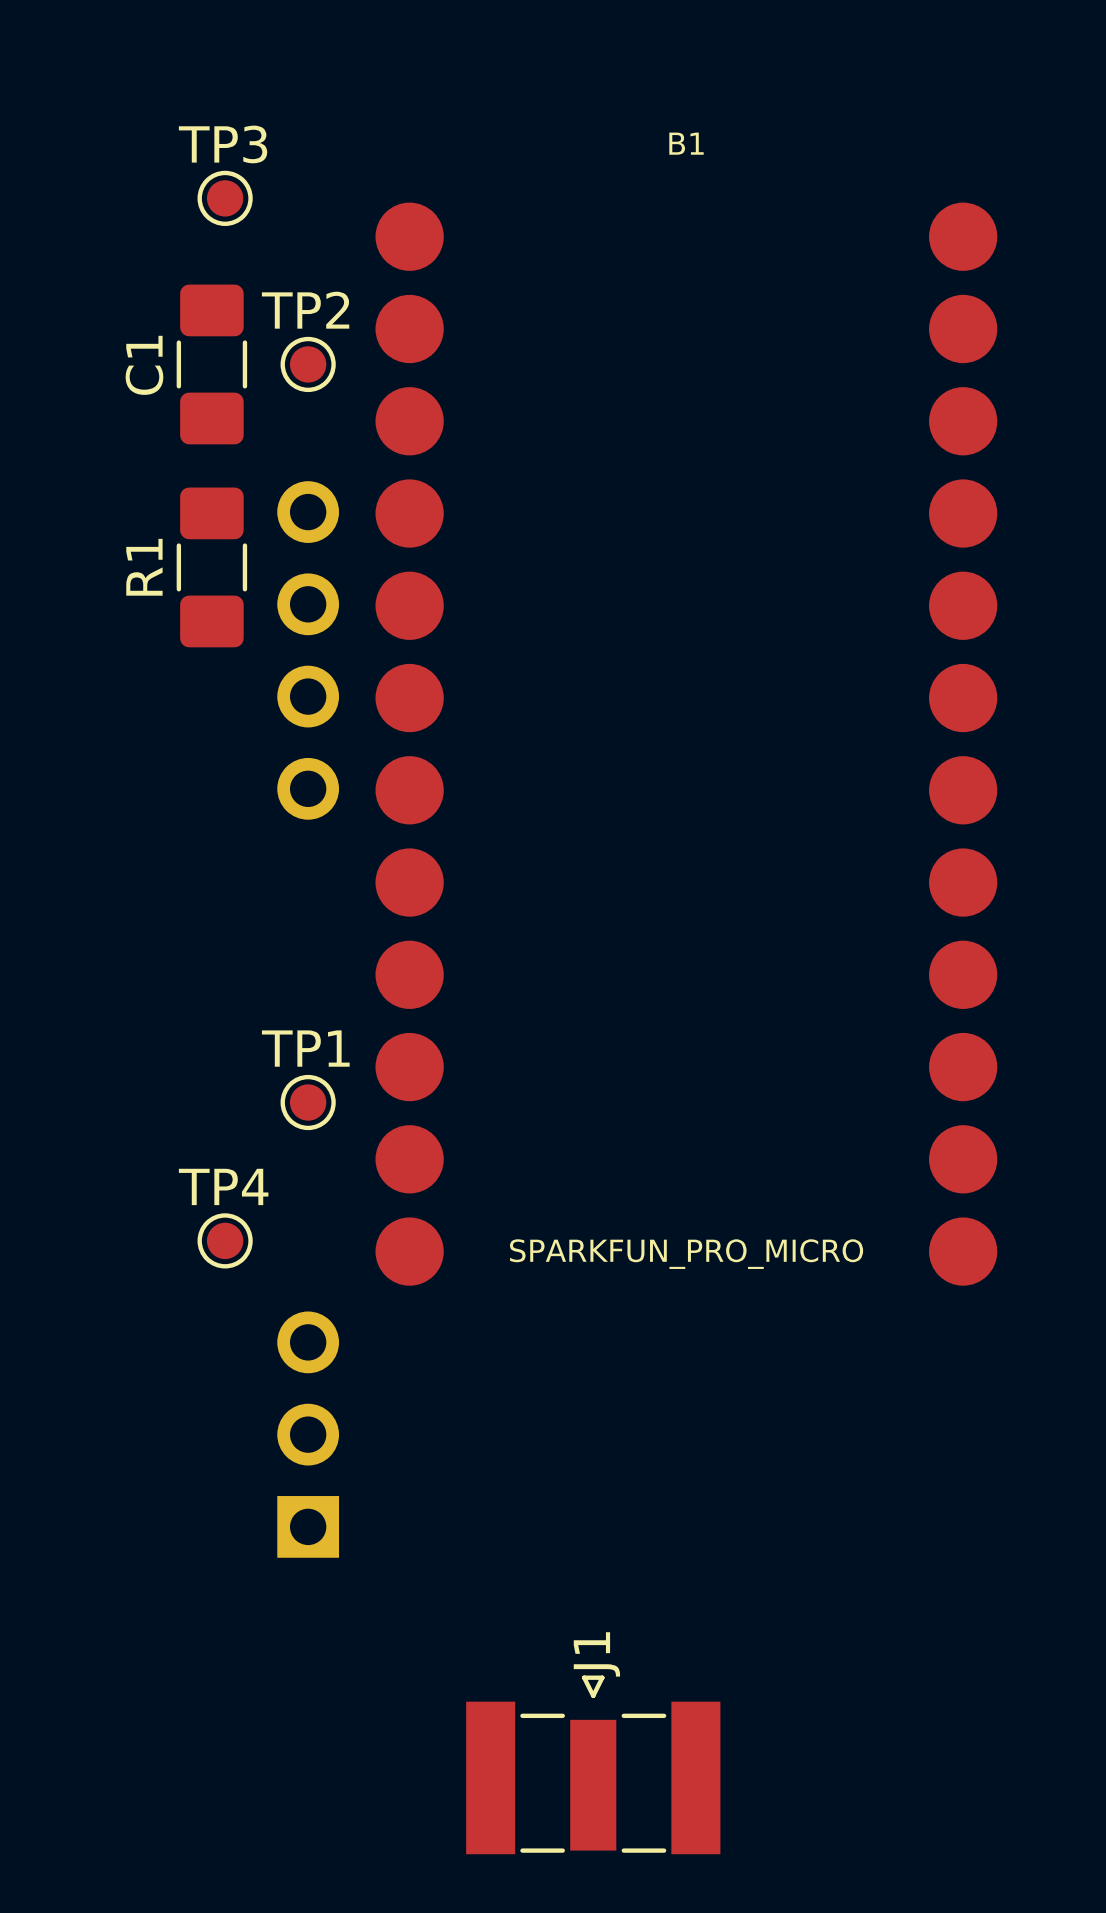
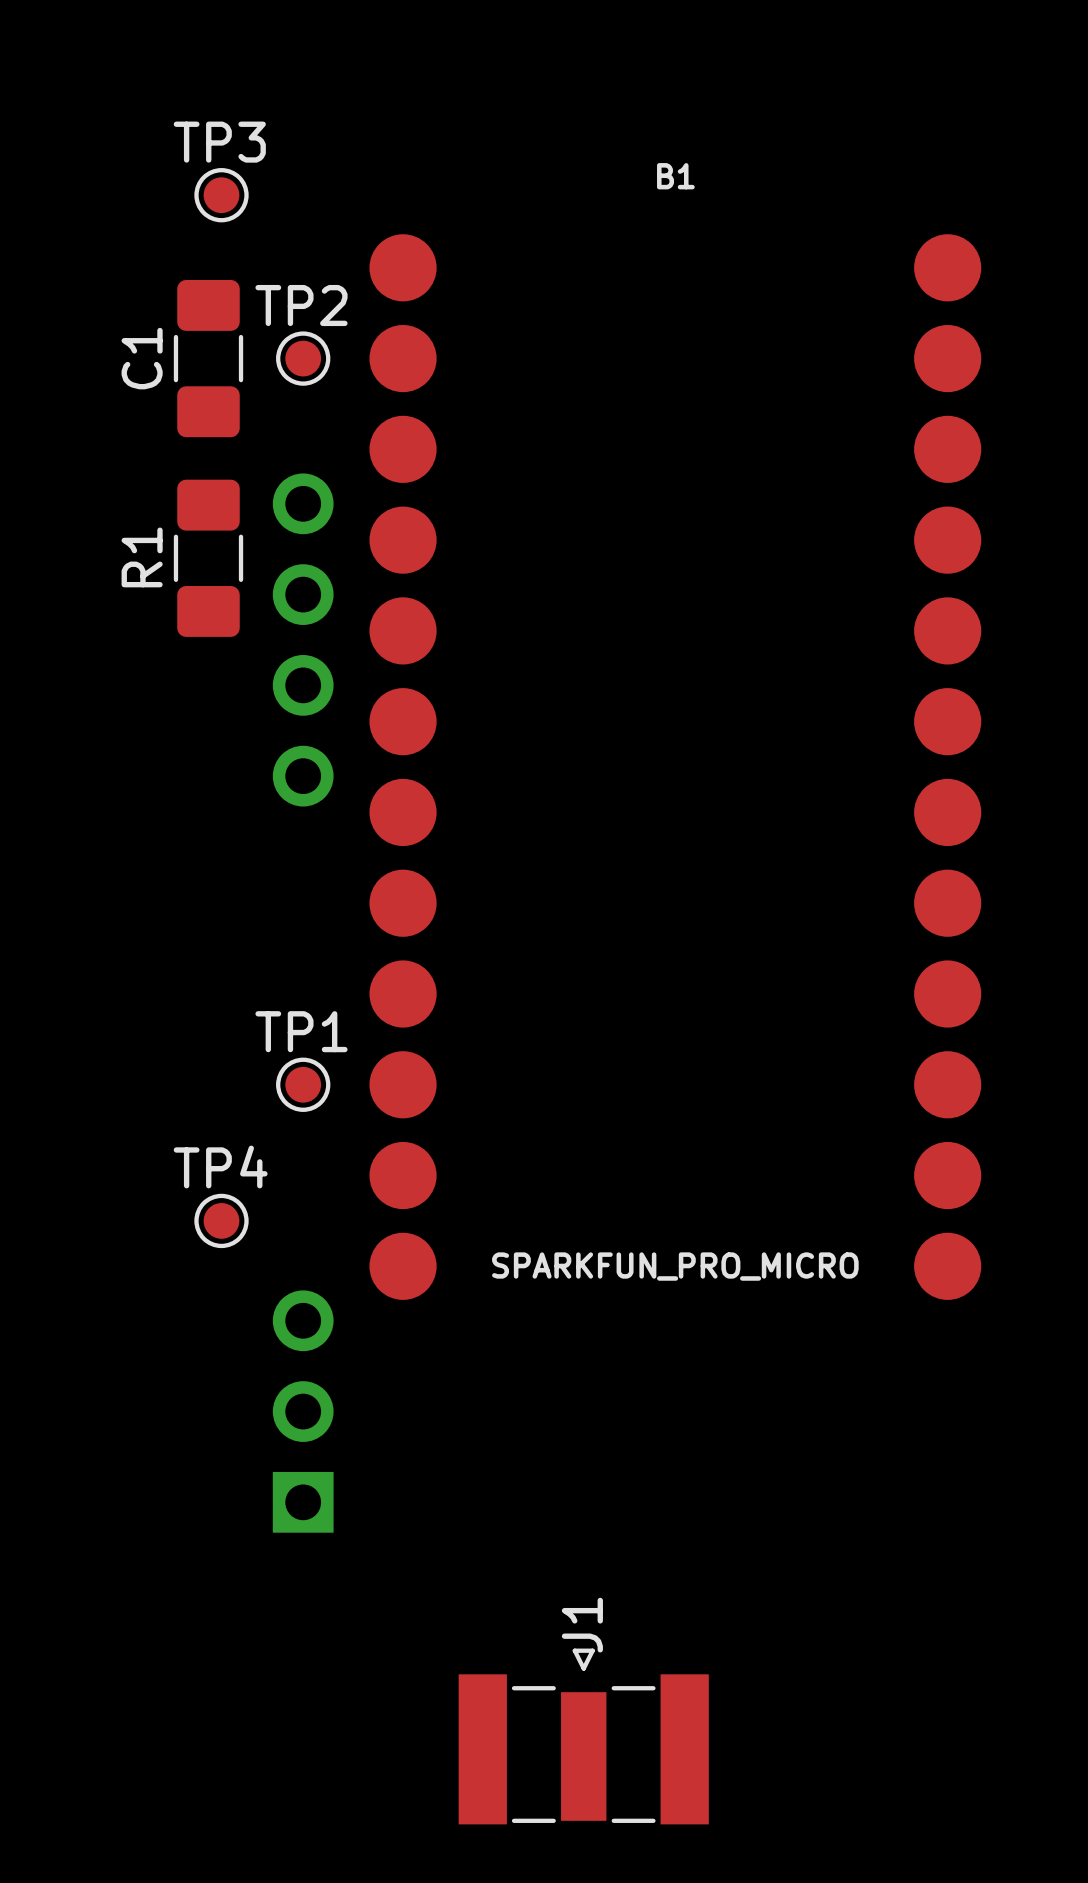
B1 position: (686, 744) -> (675, 767)

